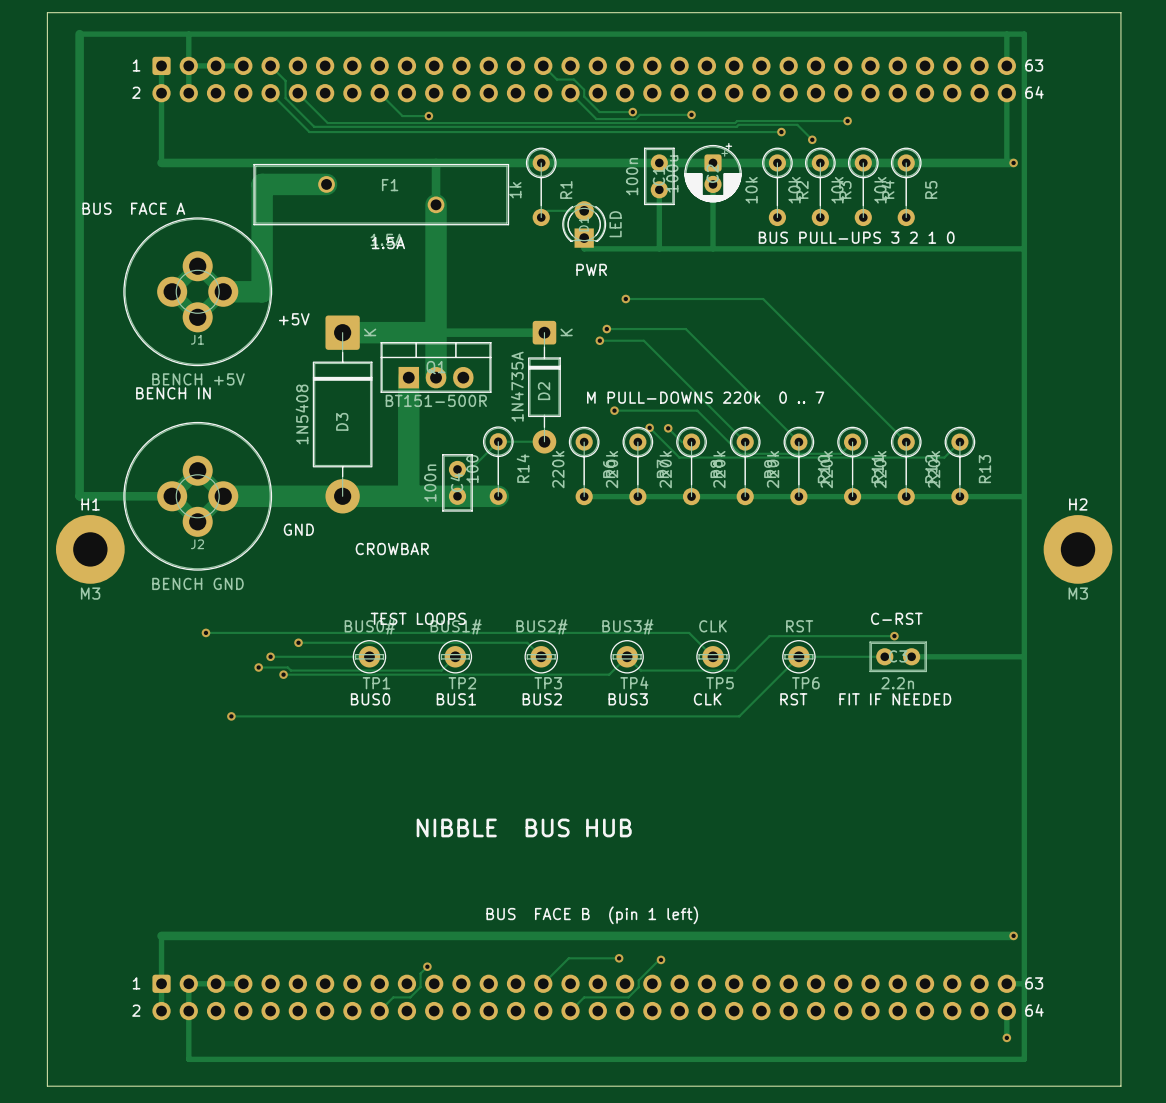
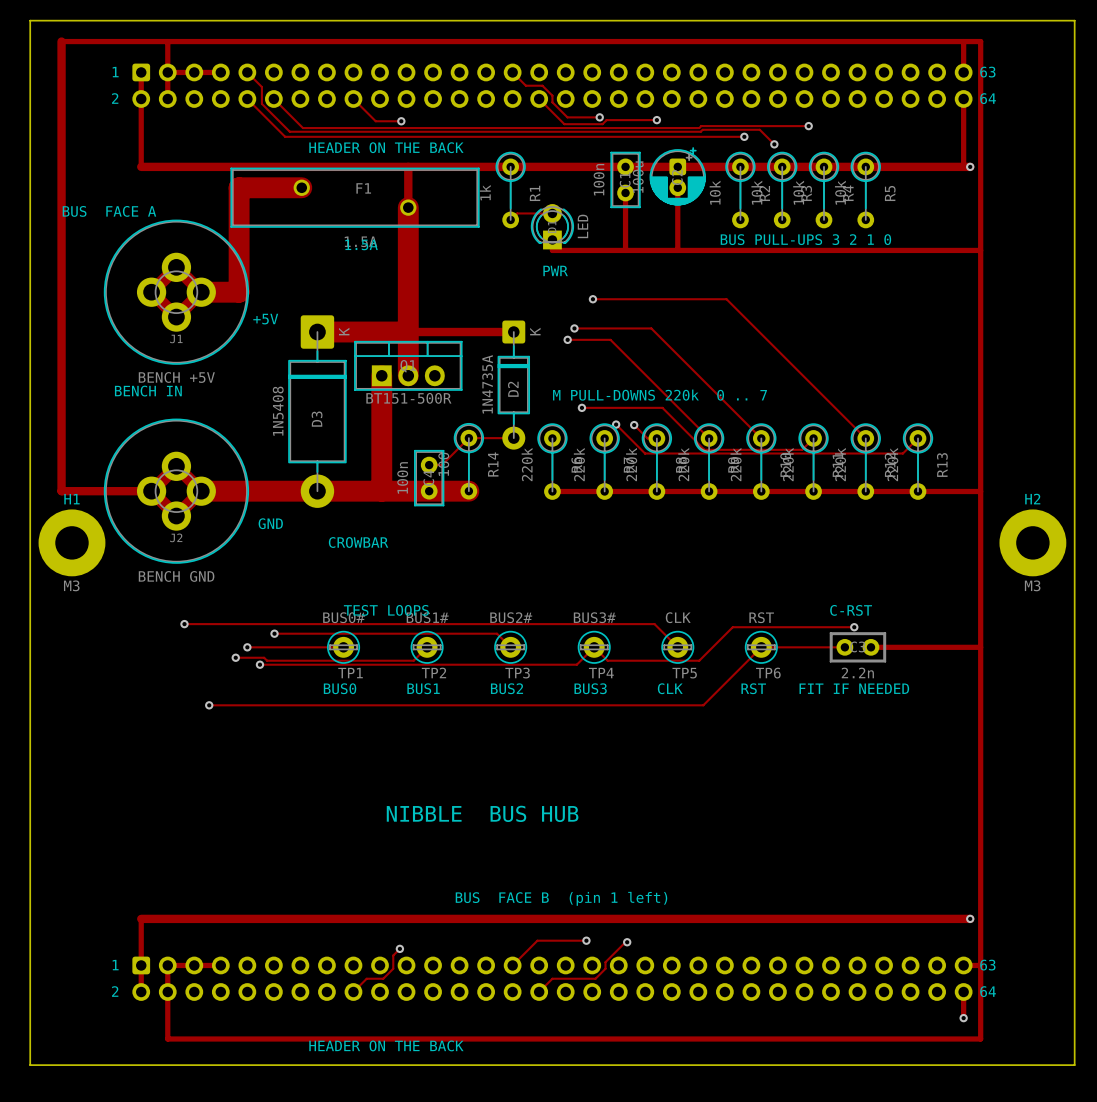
text: none -> HEADER ON THE BACK (386, 147)
text: none -> HEADER ON THE BACK (386, 1045)

